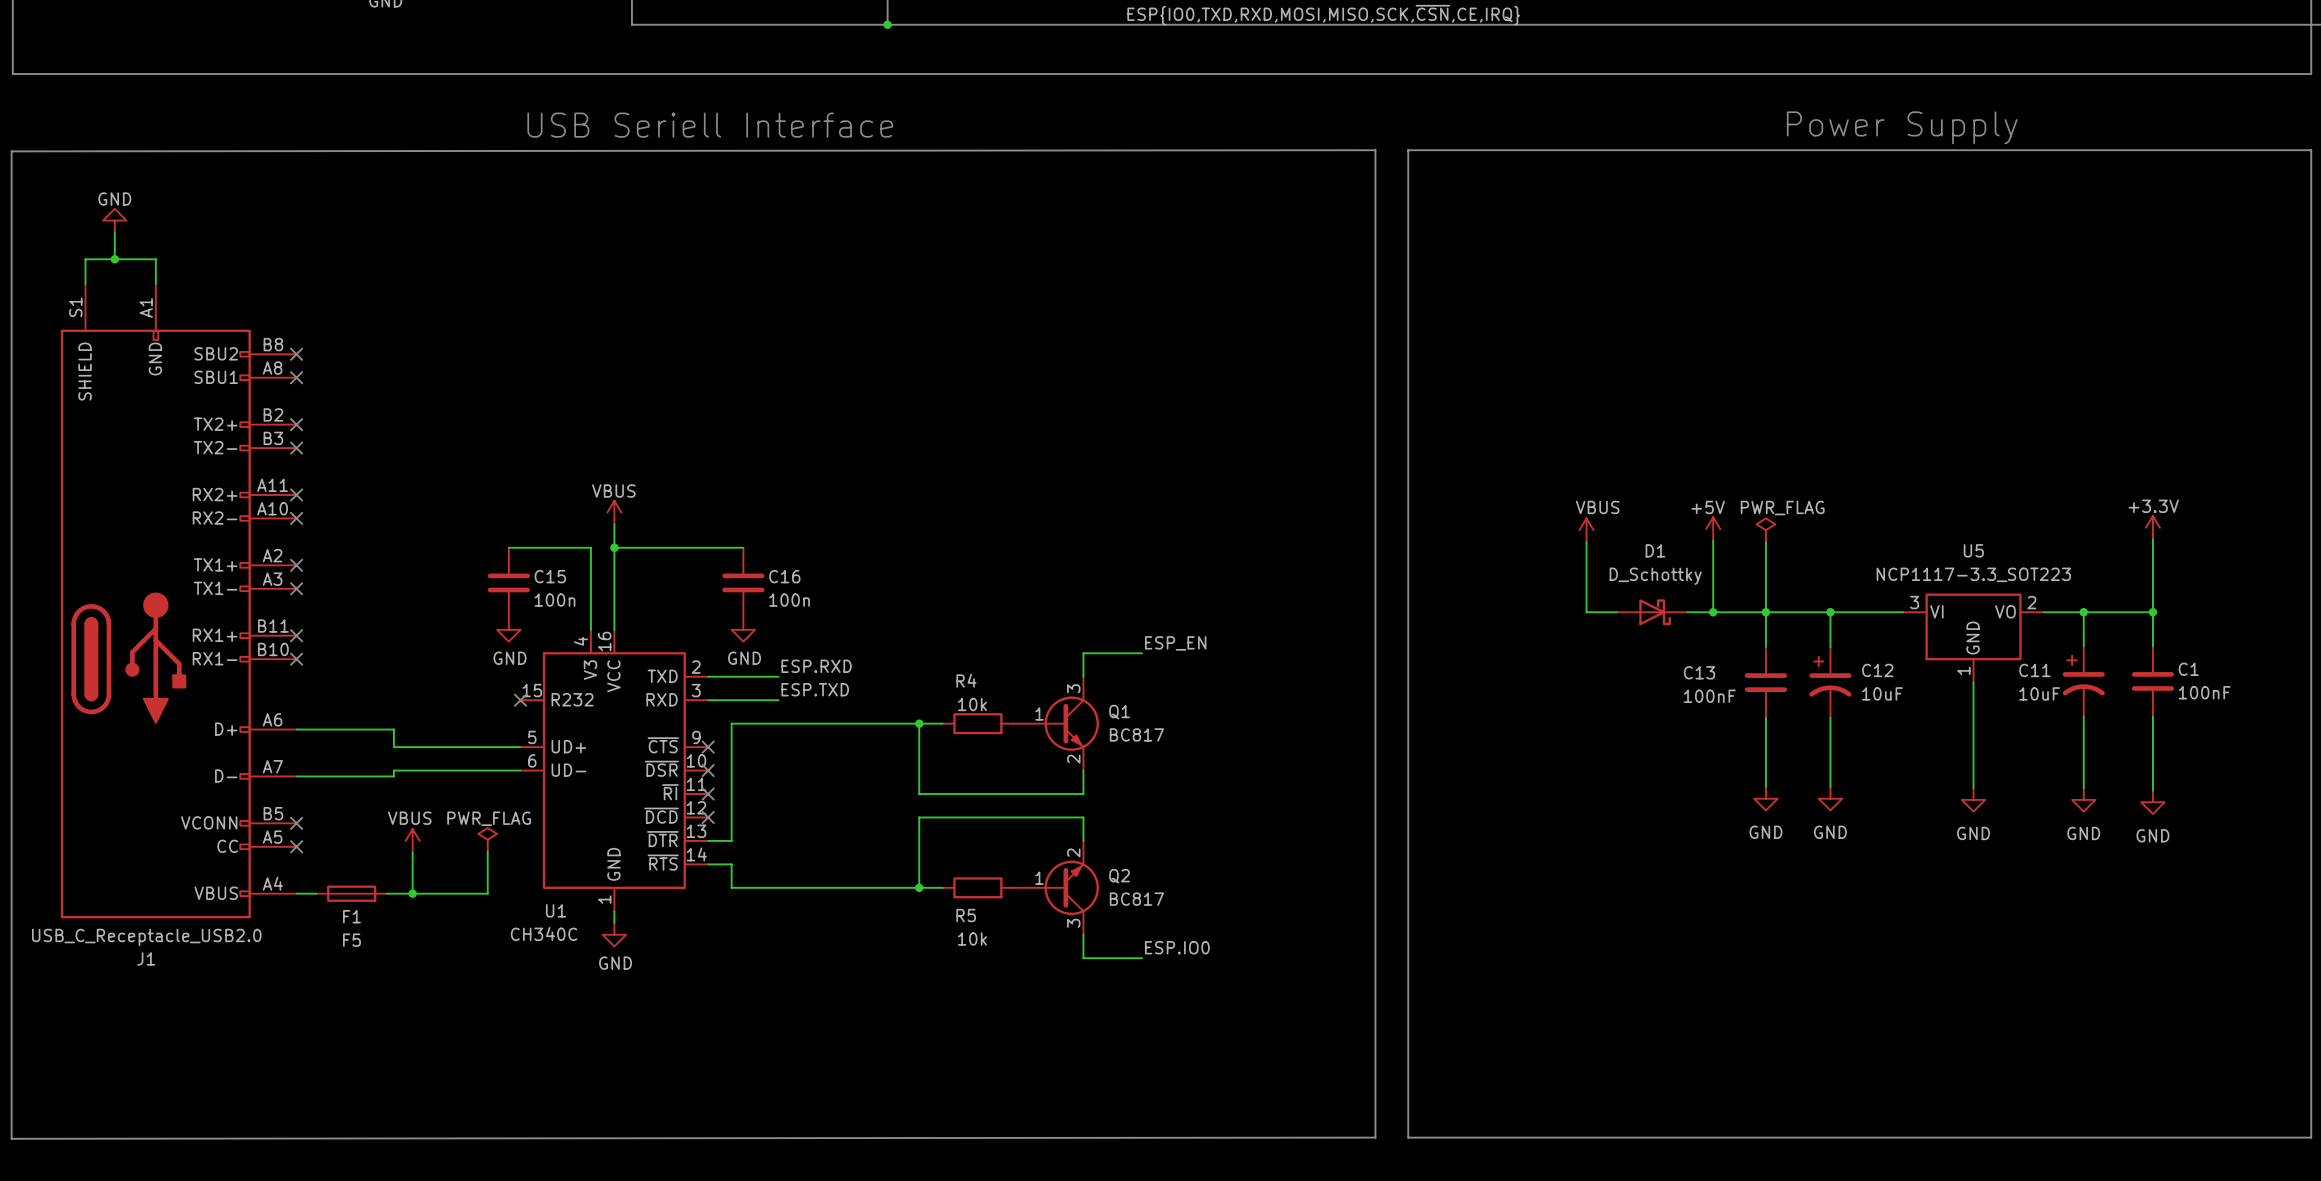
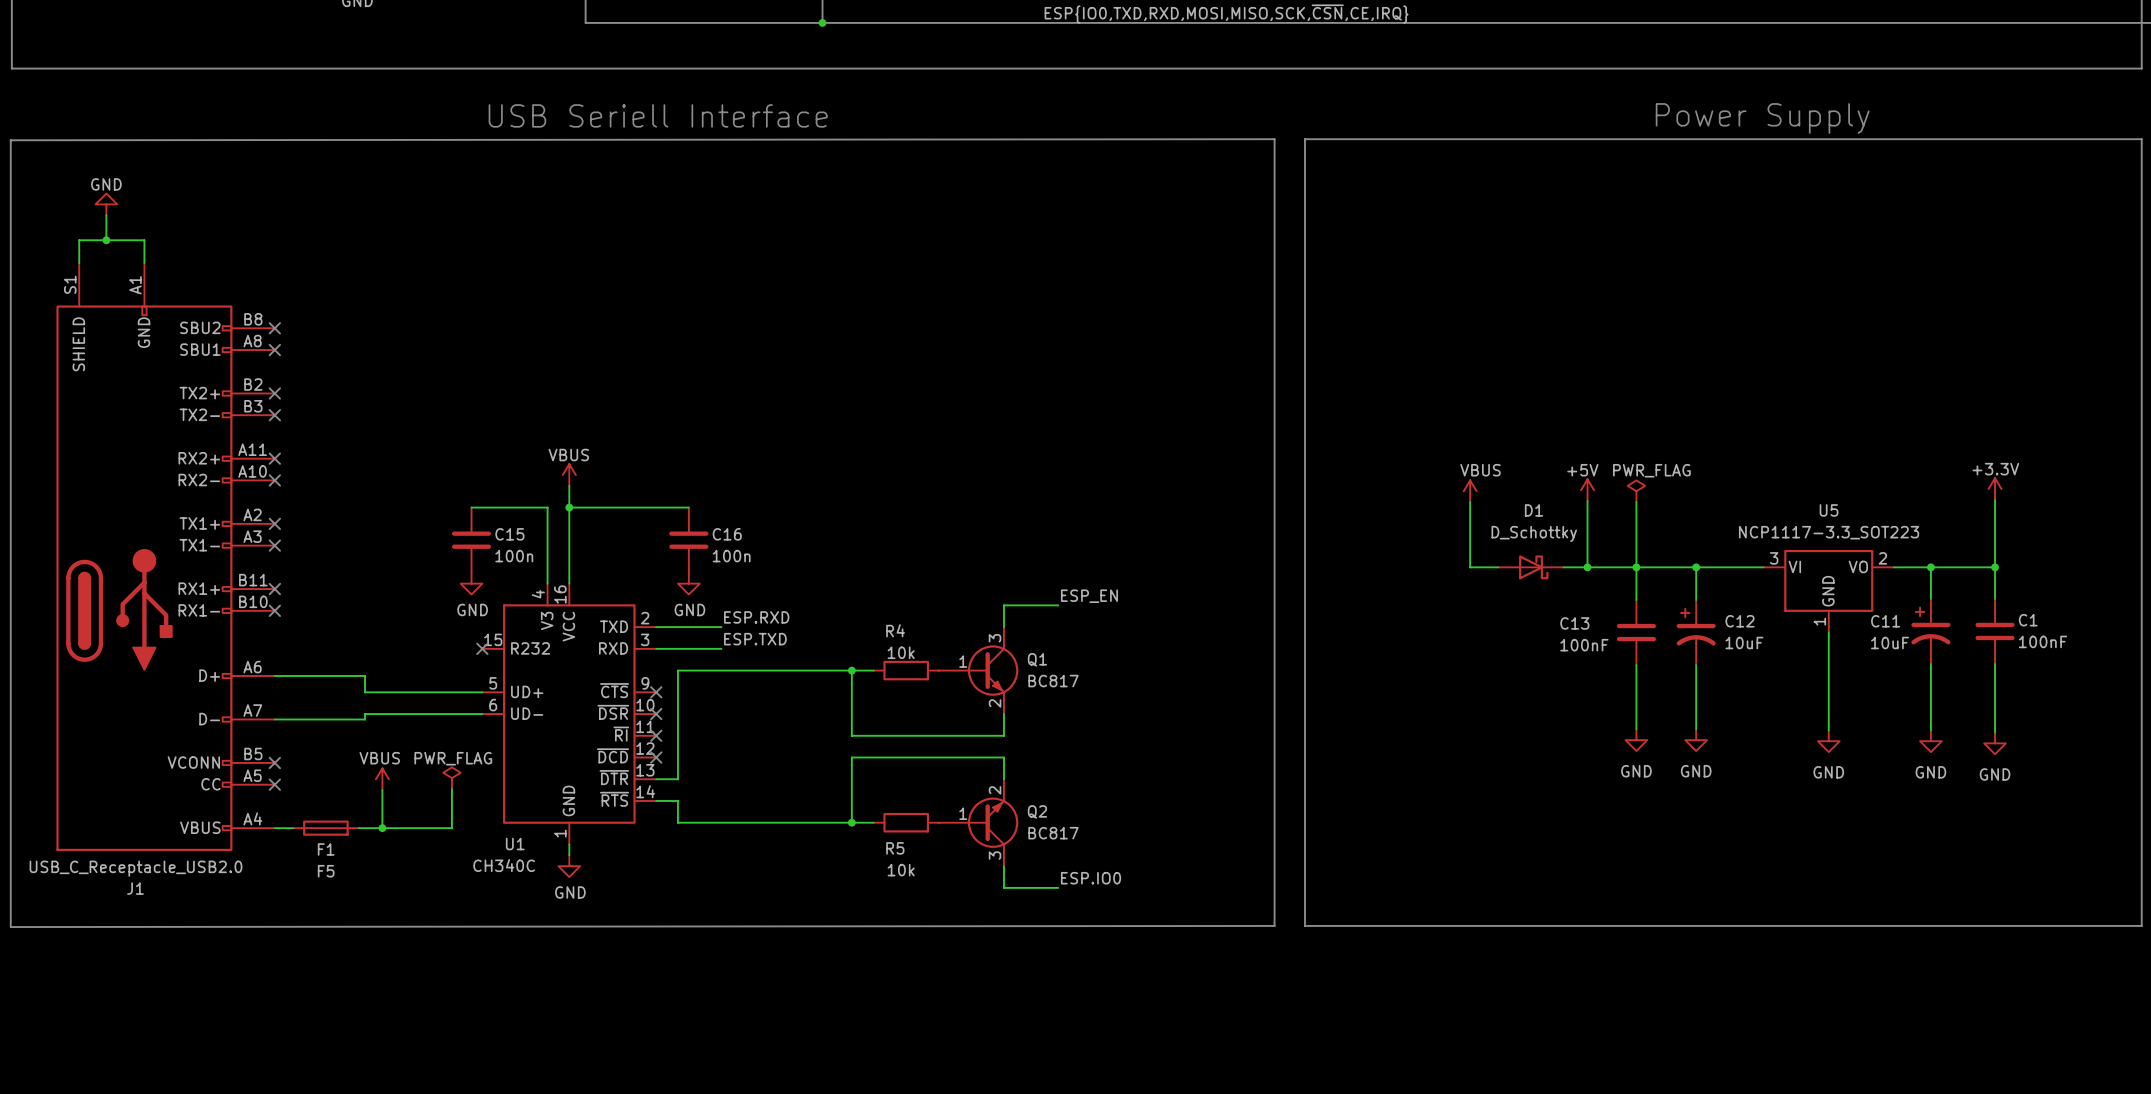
line: (1375, 999) (1375, 1137) (11, 1138) (11, 1000) -> (1274, 925) (10, 927)
line: (1408, 999) (1408, 1137) (2311, 1137) (2311, 999) -> (1304, 925) (2141, 925)

